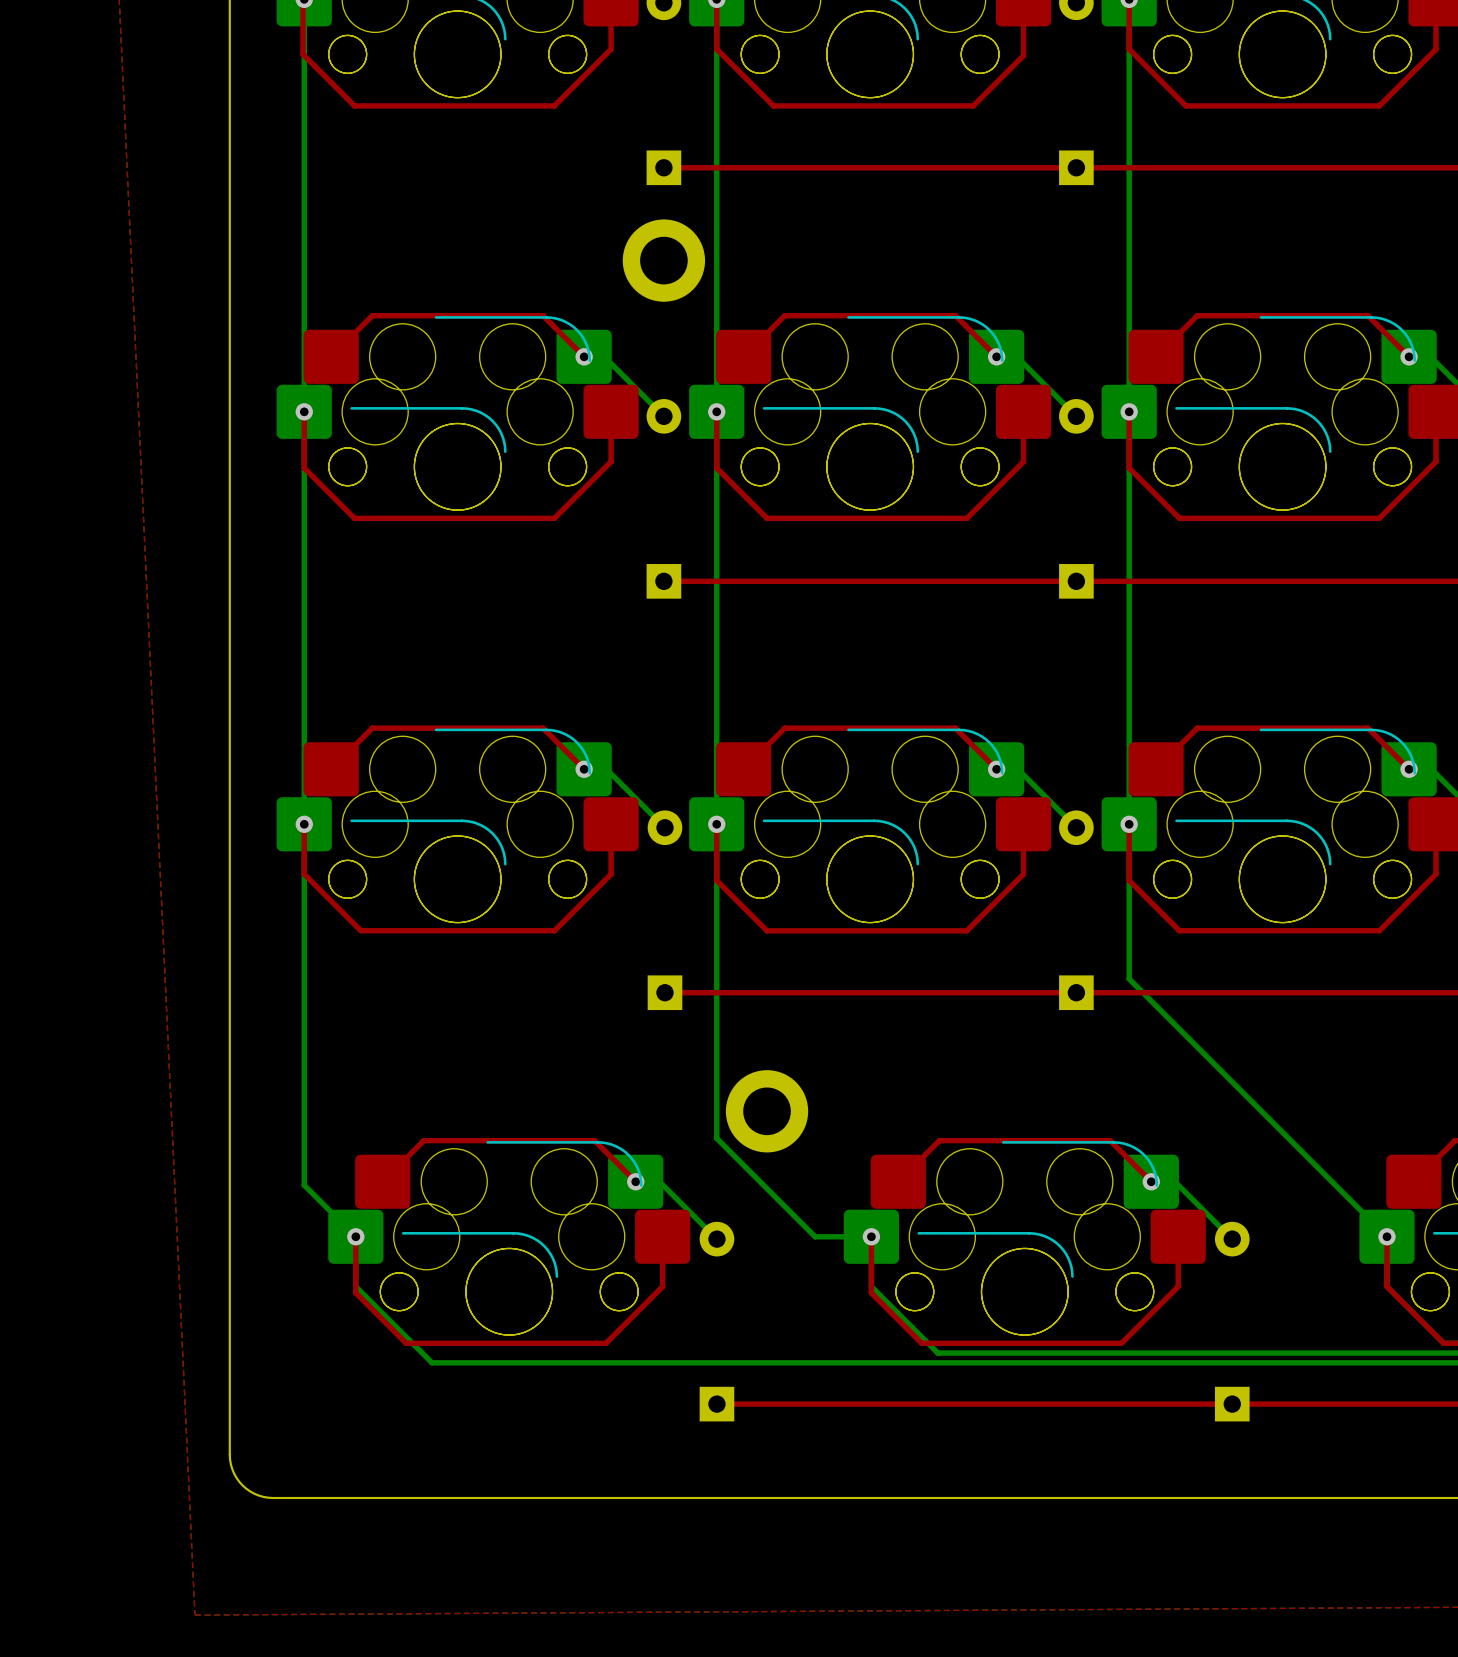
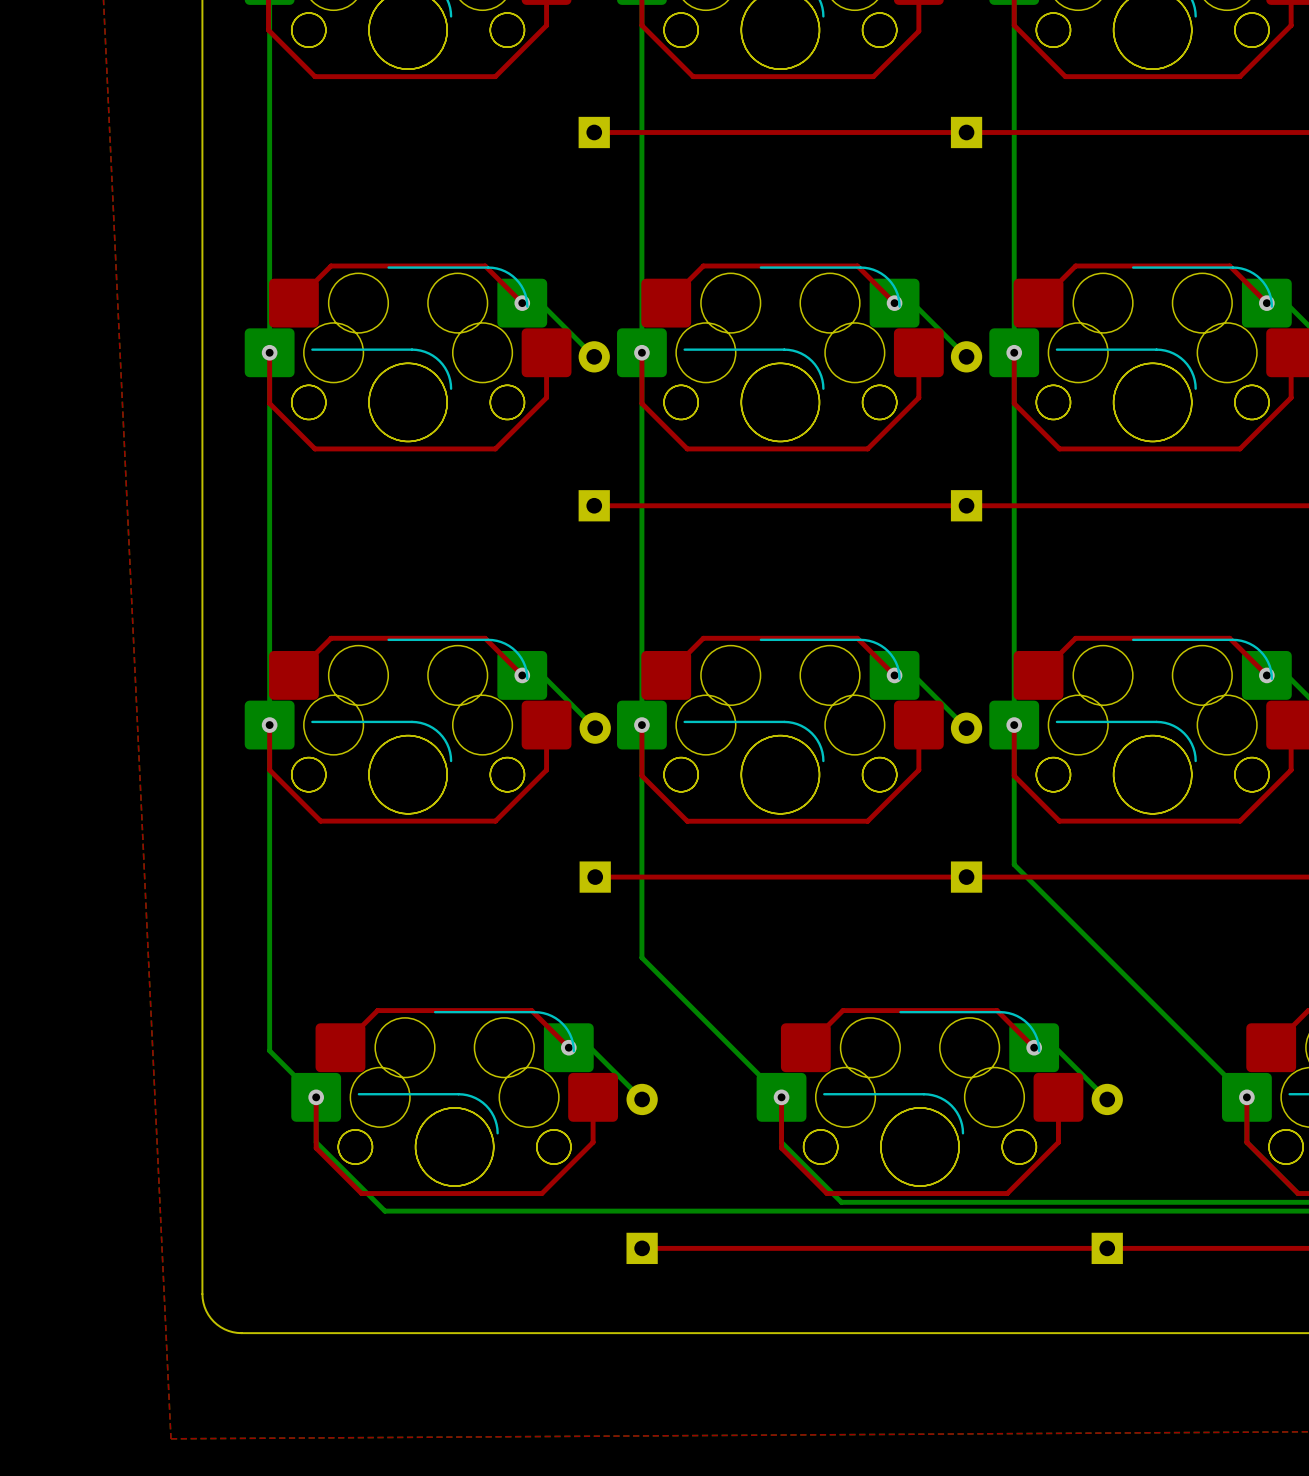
part: (663, 260) -> none
bottom track: (716, 1082) (716, 1138) (815, 1236) (871, 1236) -> (641, 957) (781, 1097)
part: (767, 1111) -> none

